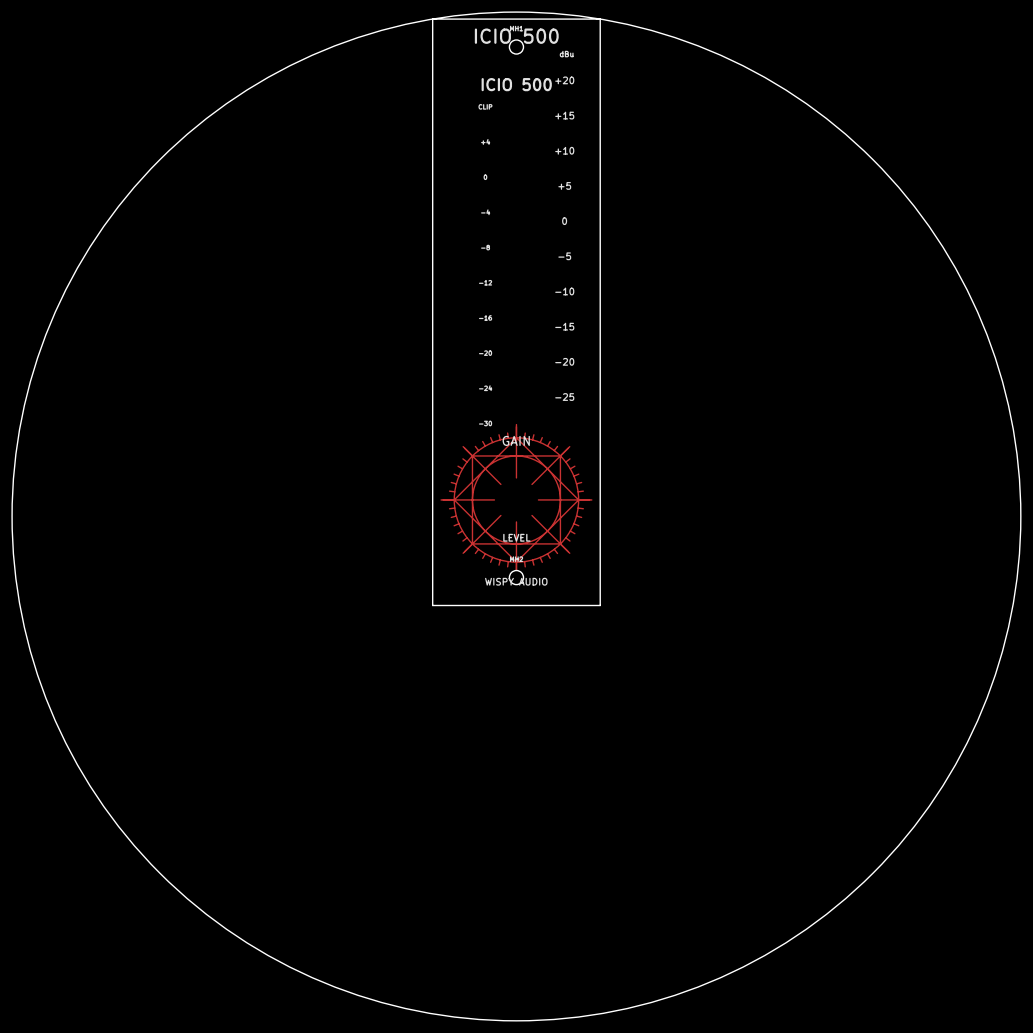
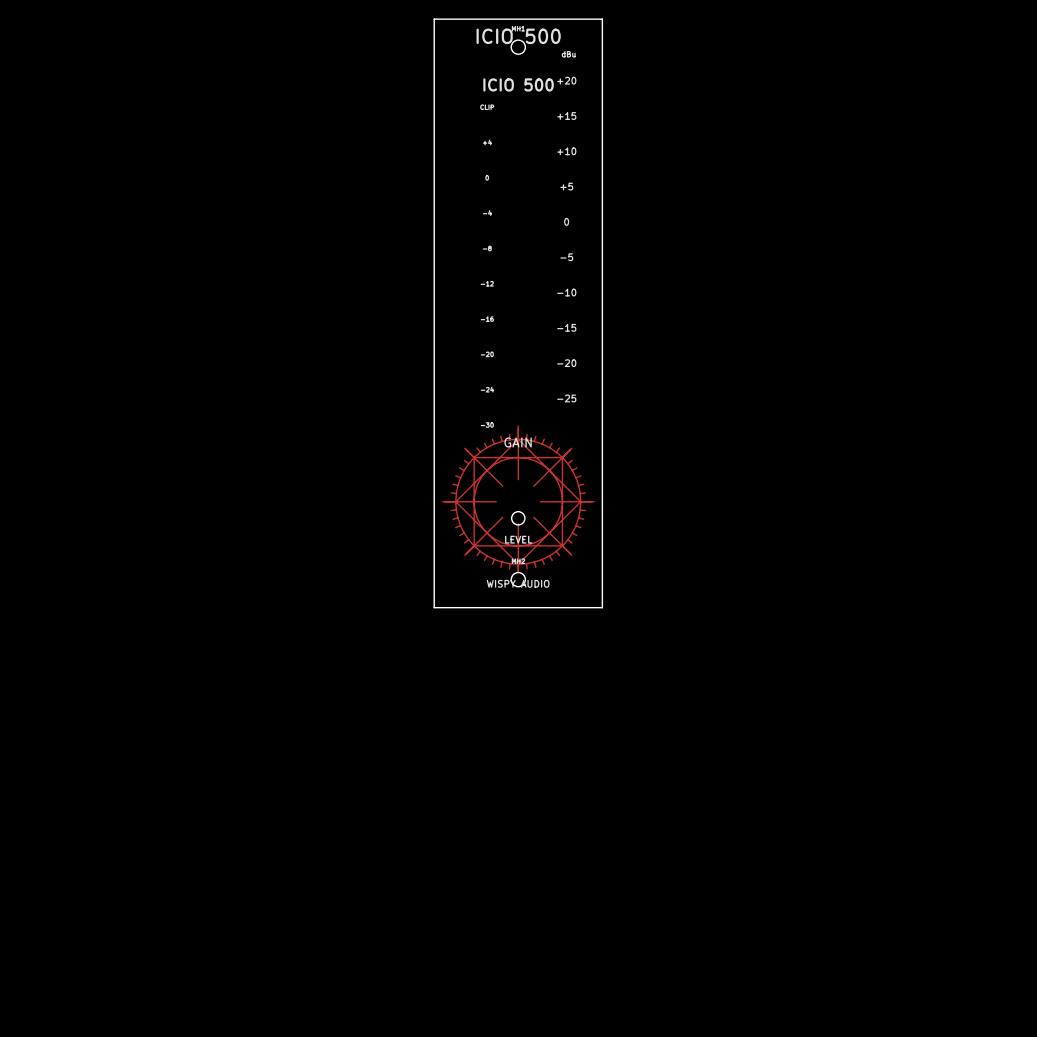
round board edge size: [11, 11, 1022, 1022] -> [511, 511, 526, 526]

